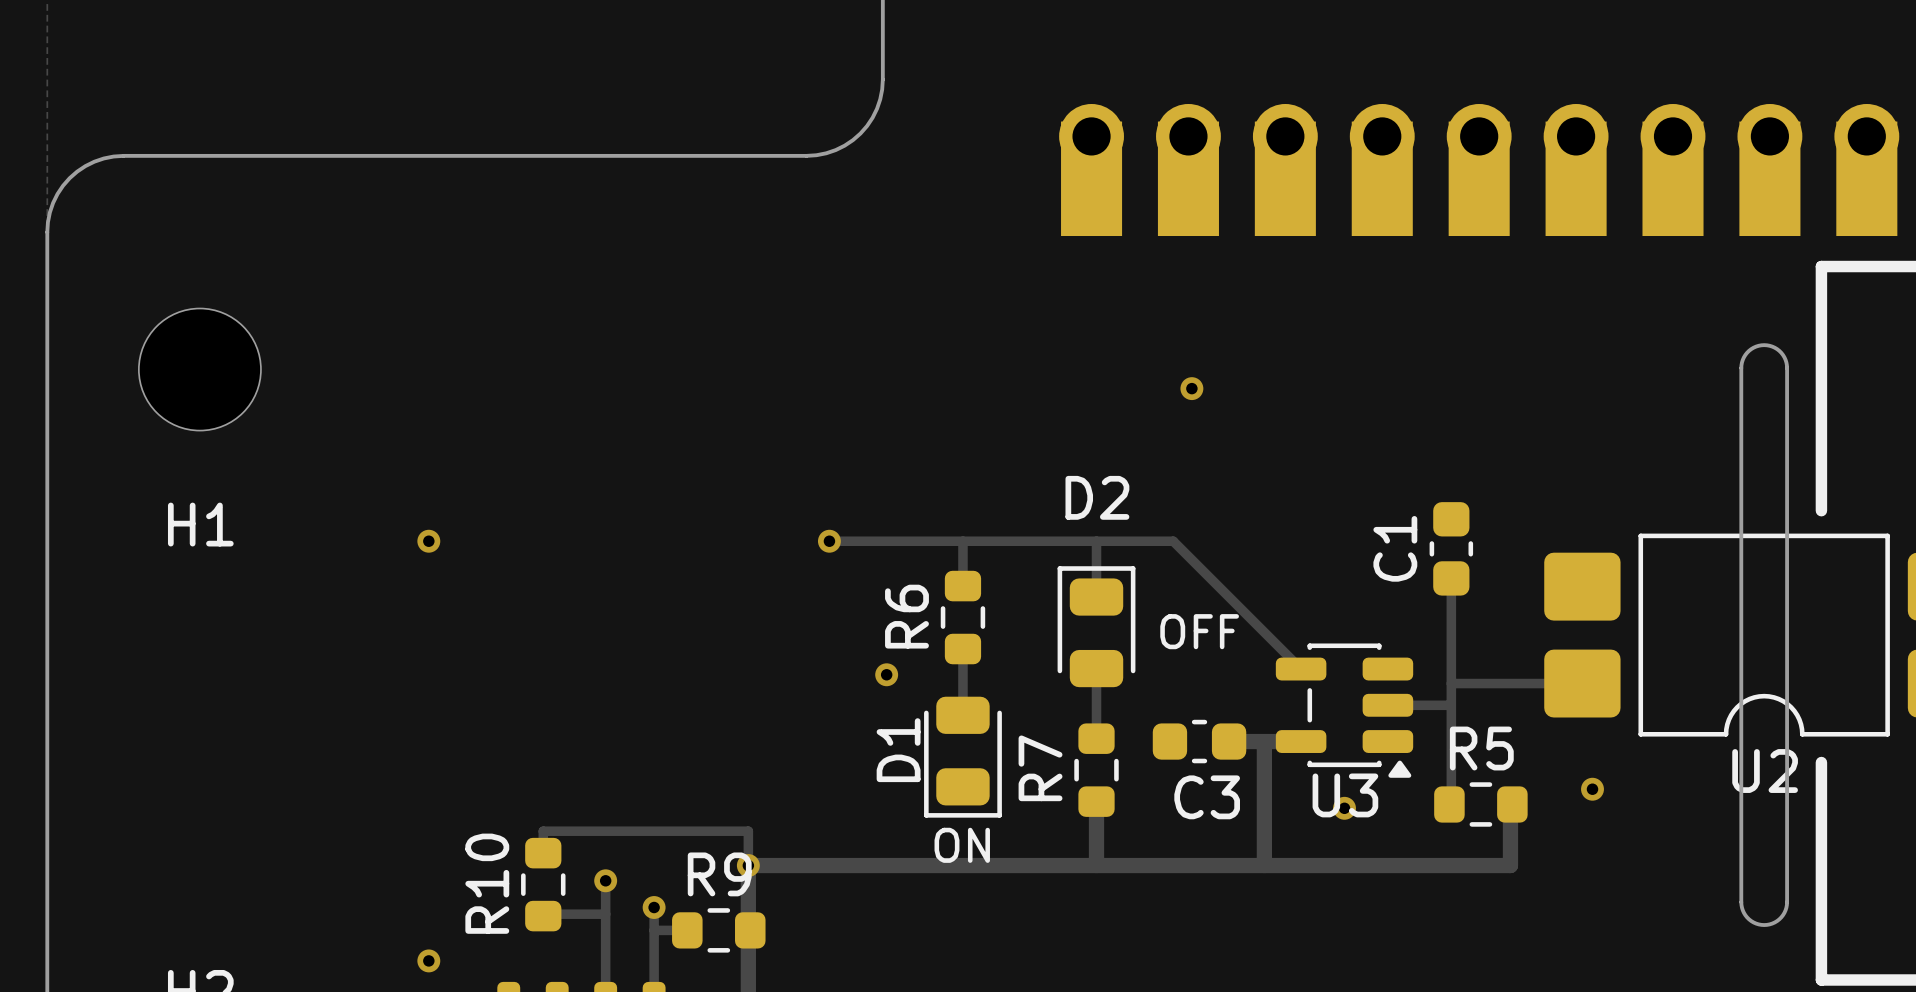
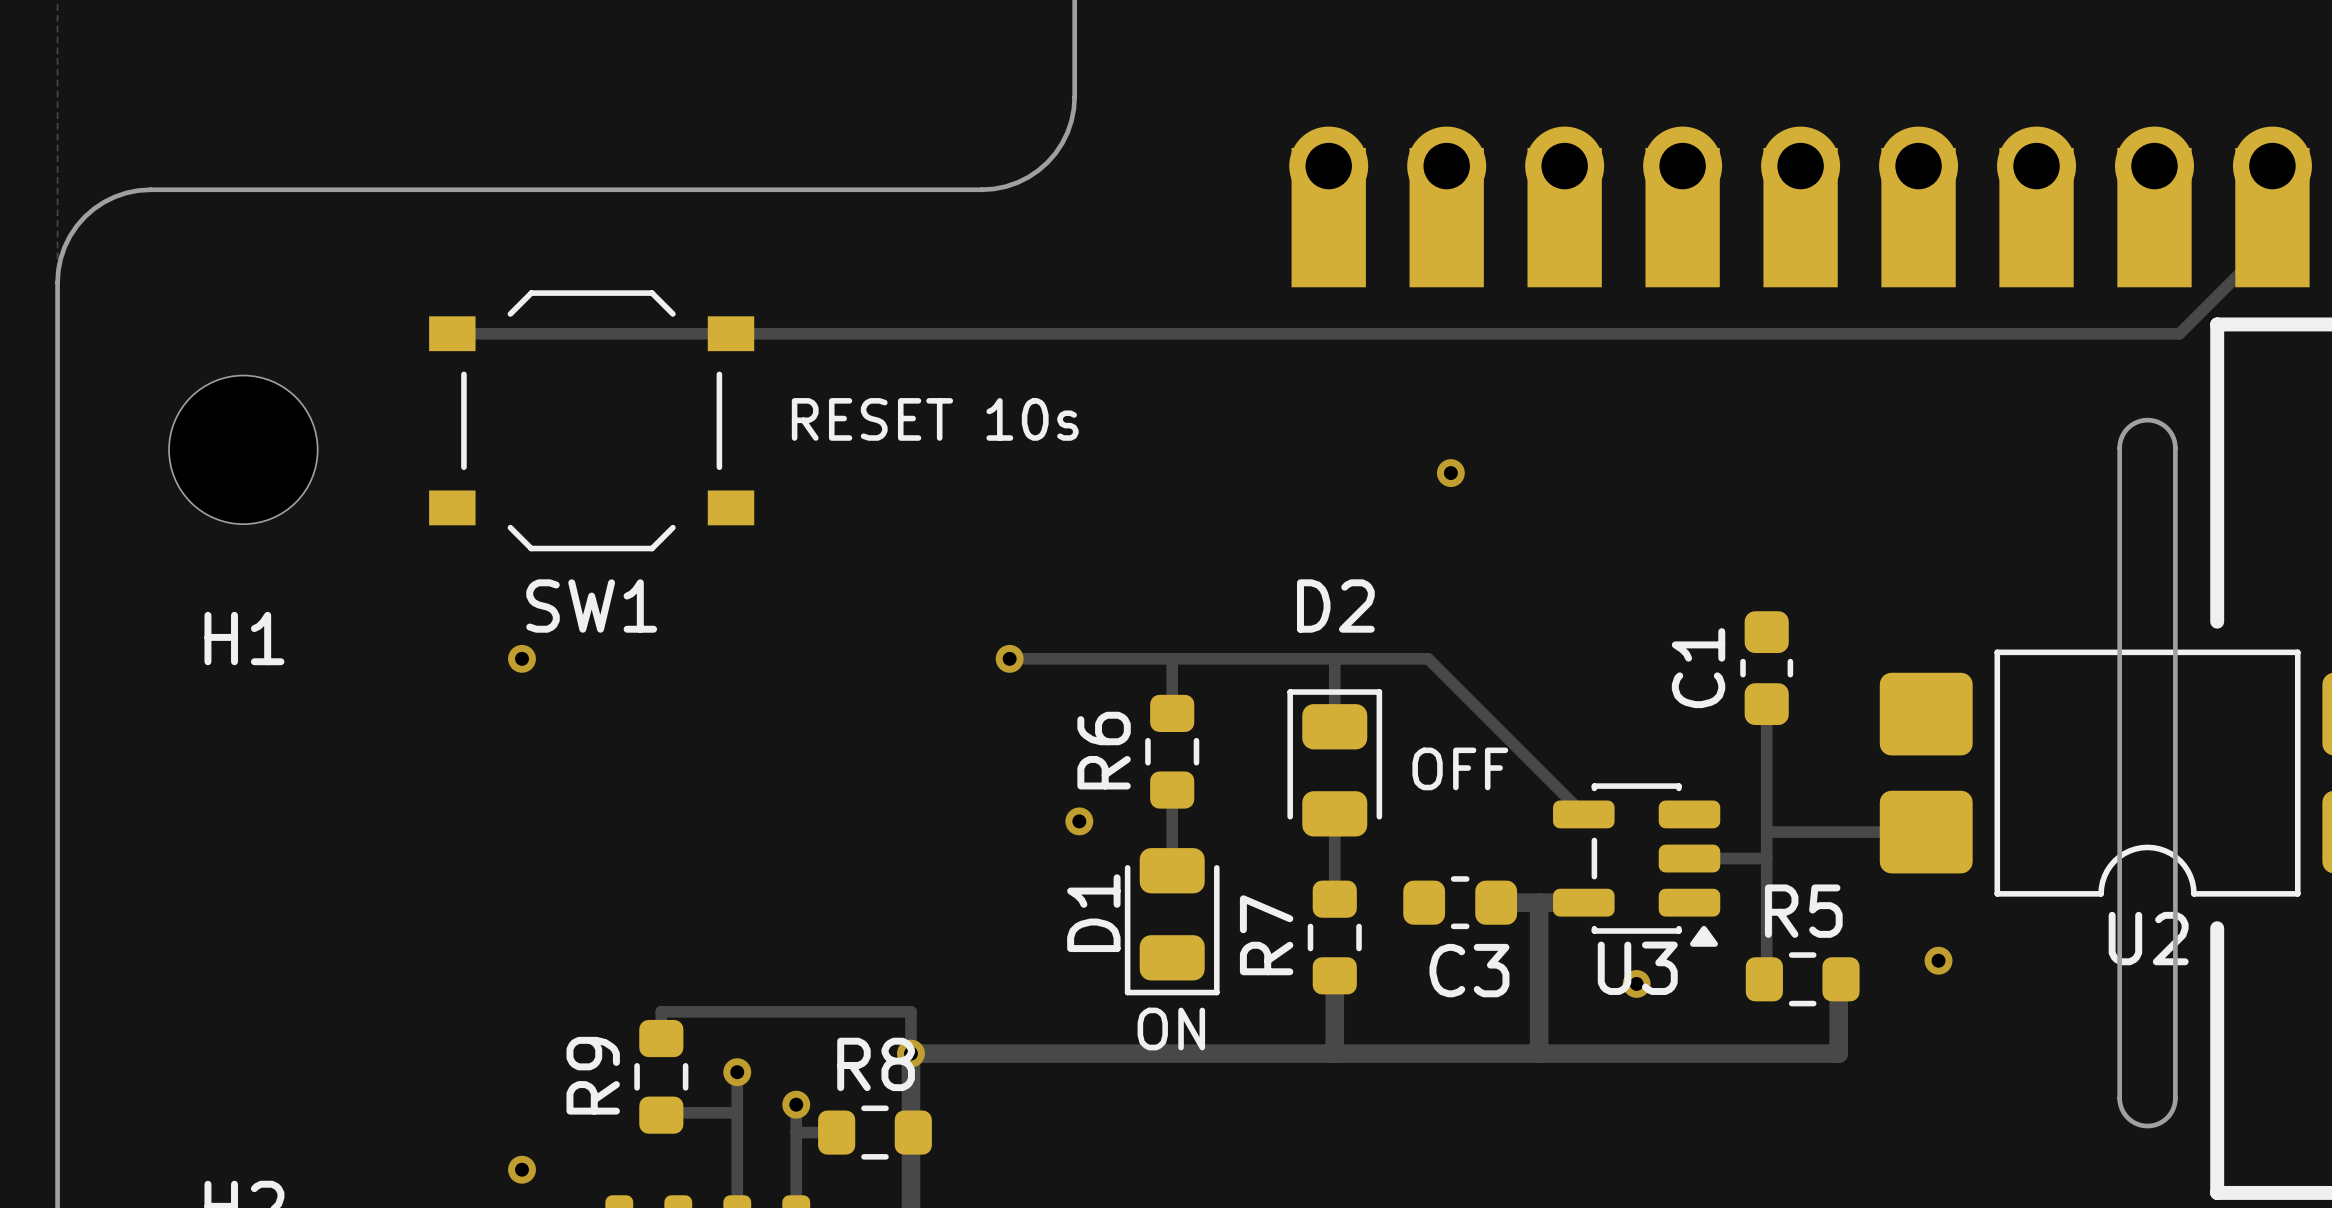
track: none -> (2272, 166) (2272, 240) (2179, 333) (452, 333)
text: none -> RESET 10s (935, 419)
SW1: none -> (591, 420)
R9 name: R9 (719, 874) -> R8 (876, 1064)
R10 name: R10 (487, 883) -> R9 (593, 1075)

